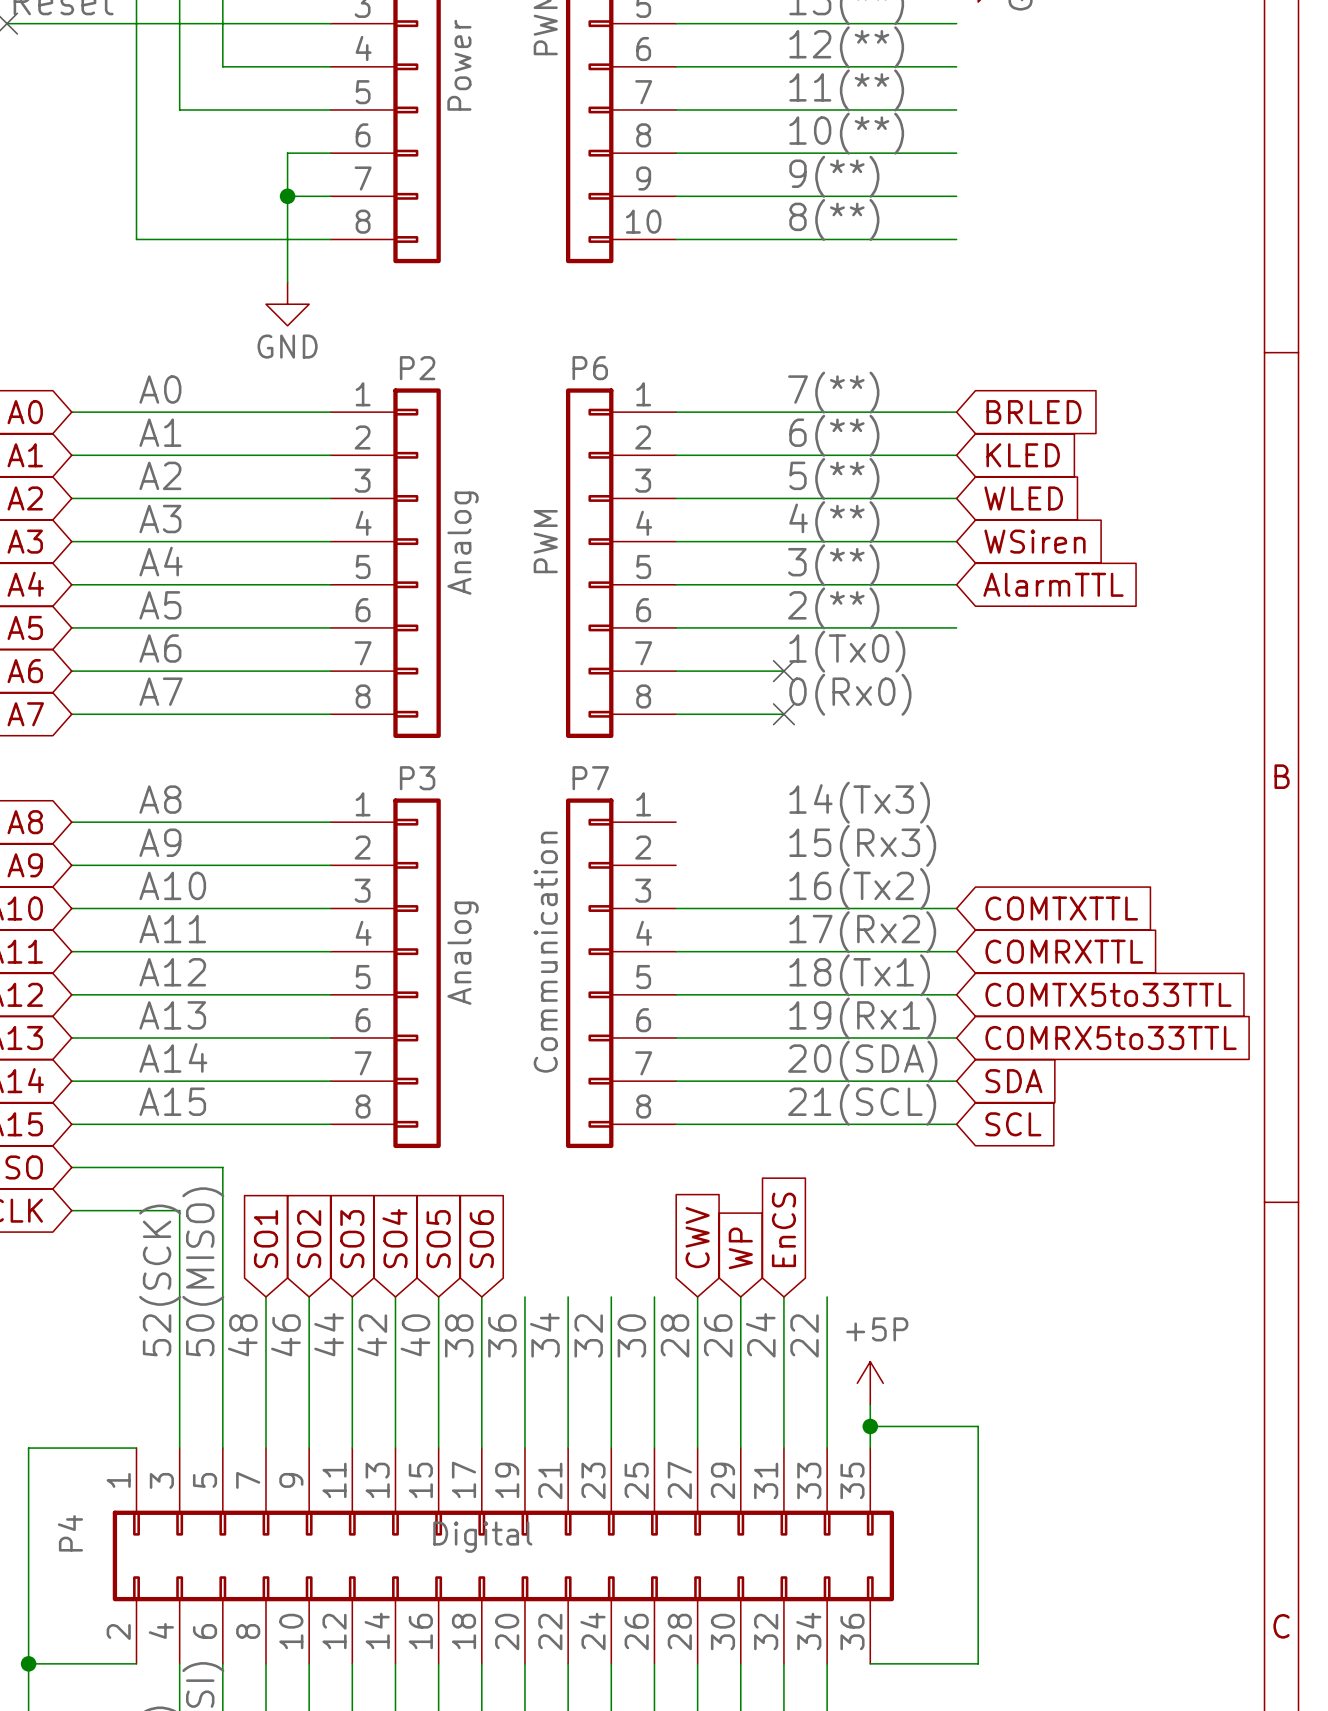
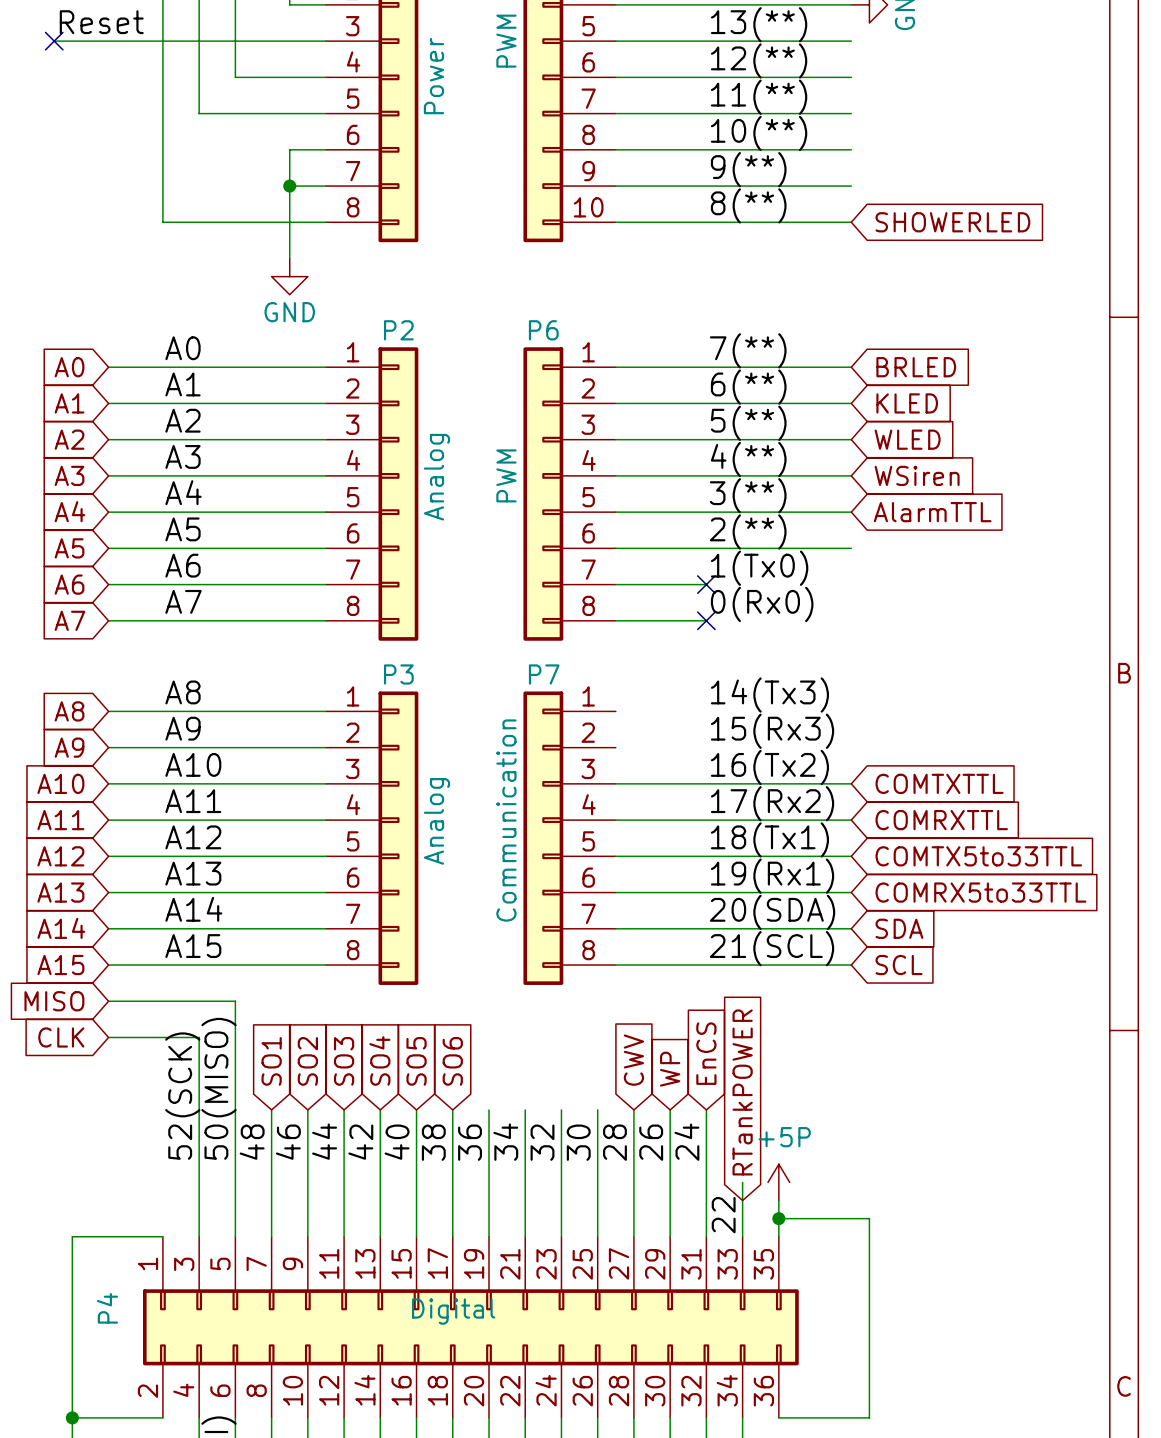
global label: none -> SHOWERLED (952, 222)
global label: none -> RTankPOWER (742, 1092)
wire: (827, 1296) (827, 1383) -> none
label position: 22 (804, 1335) -> 22 (723, 1215)

